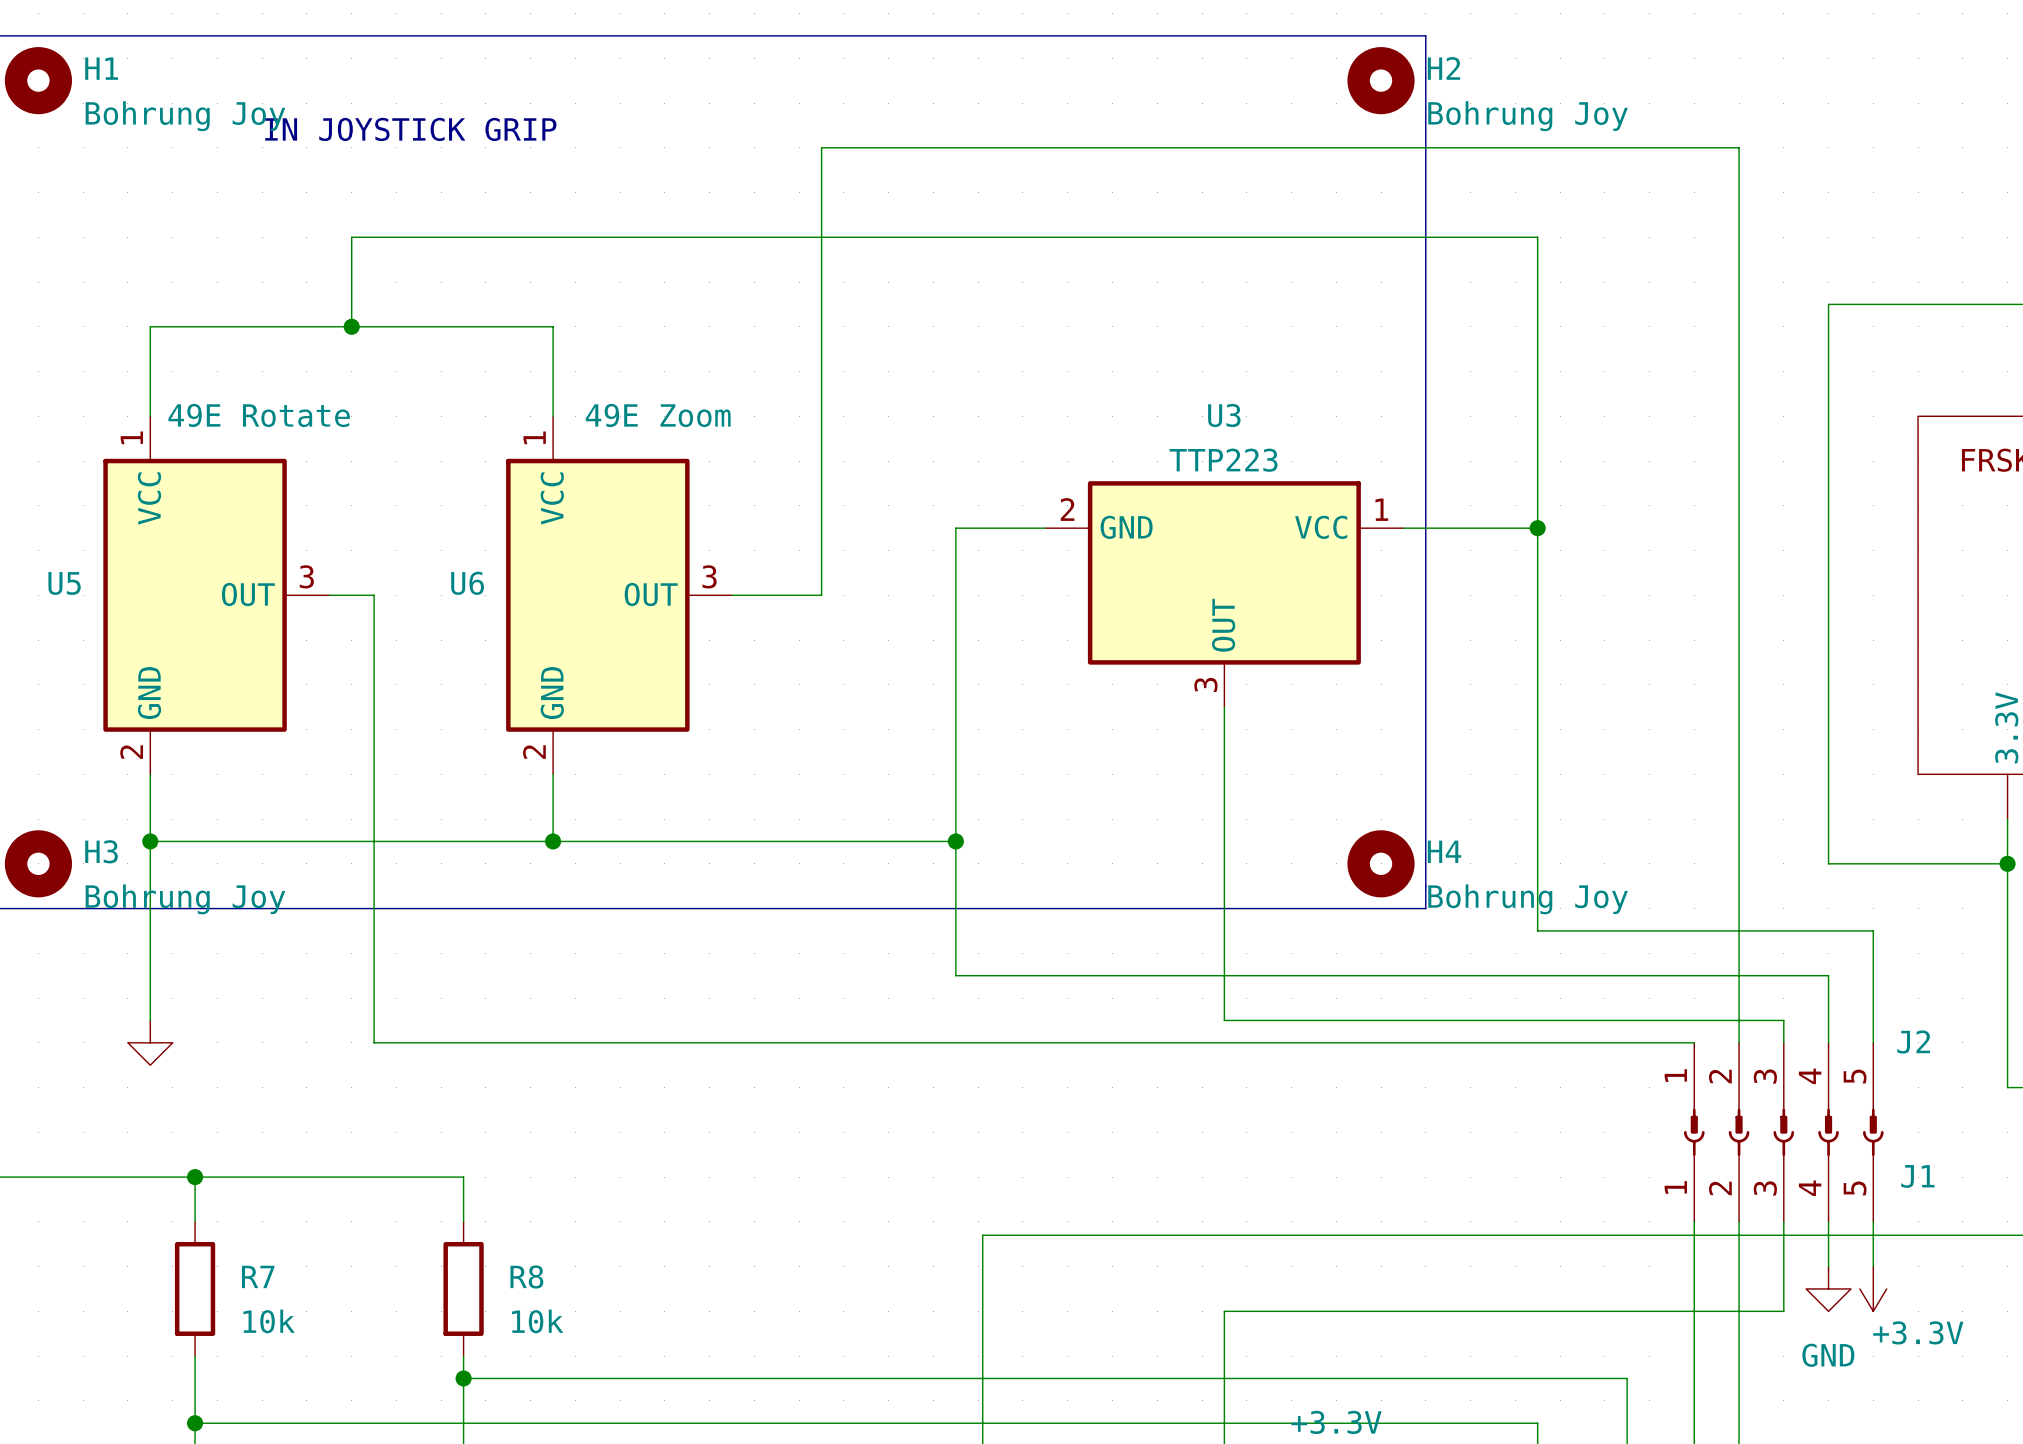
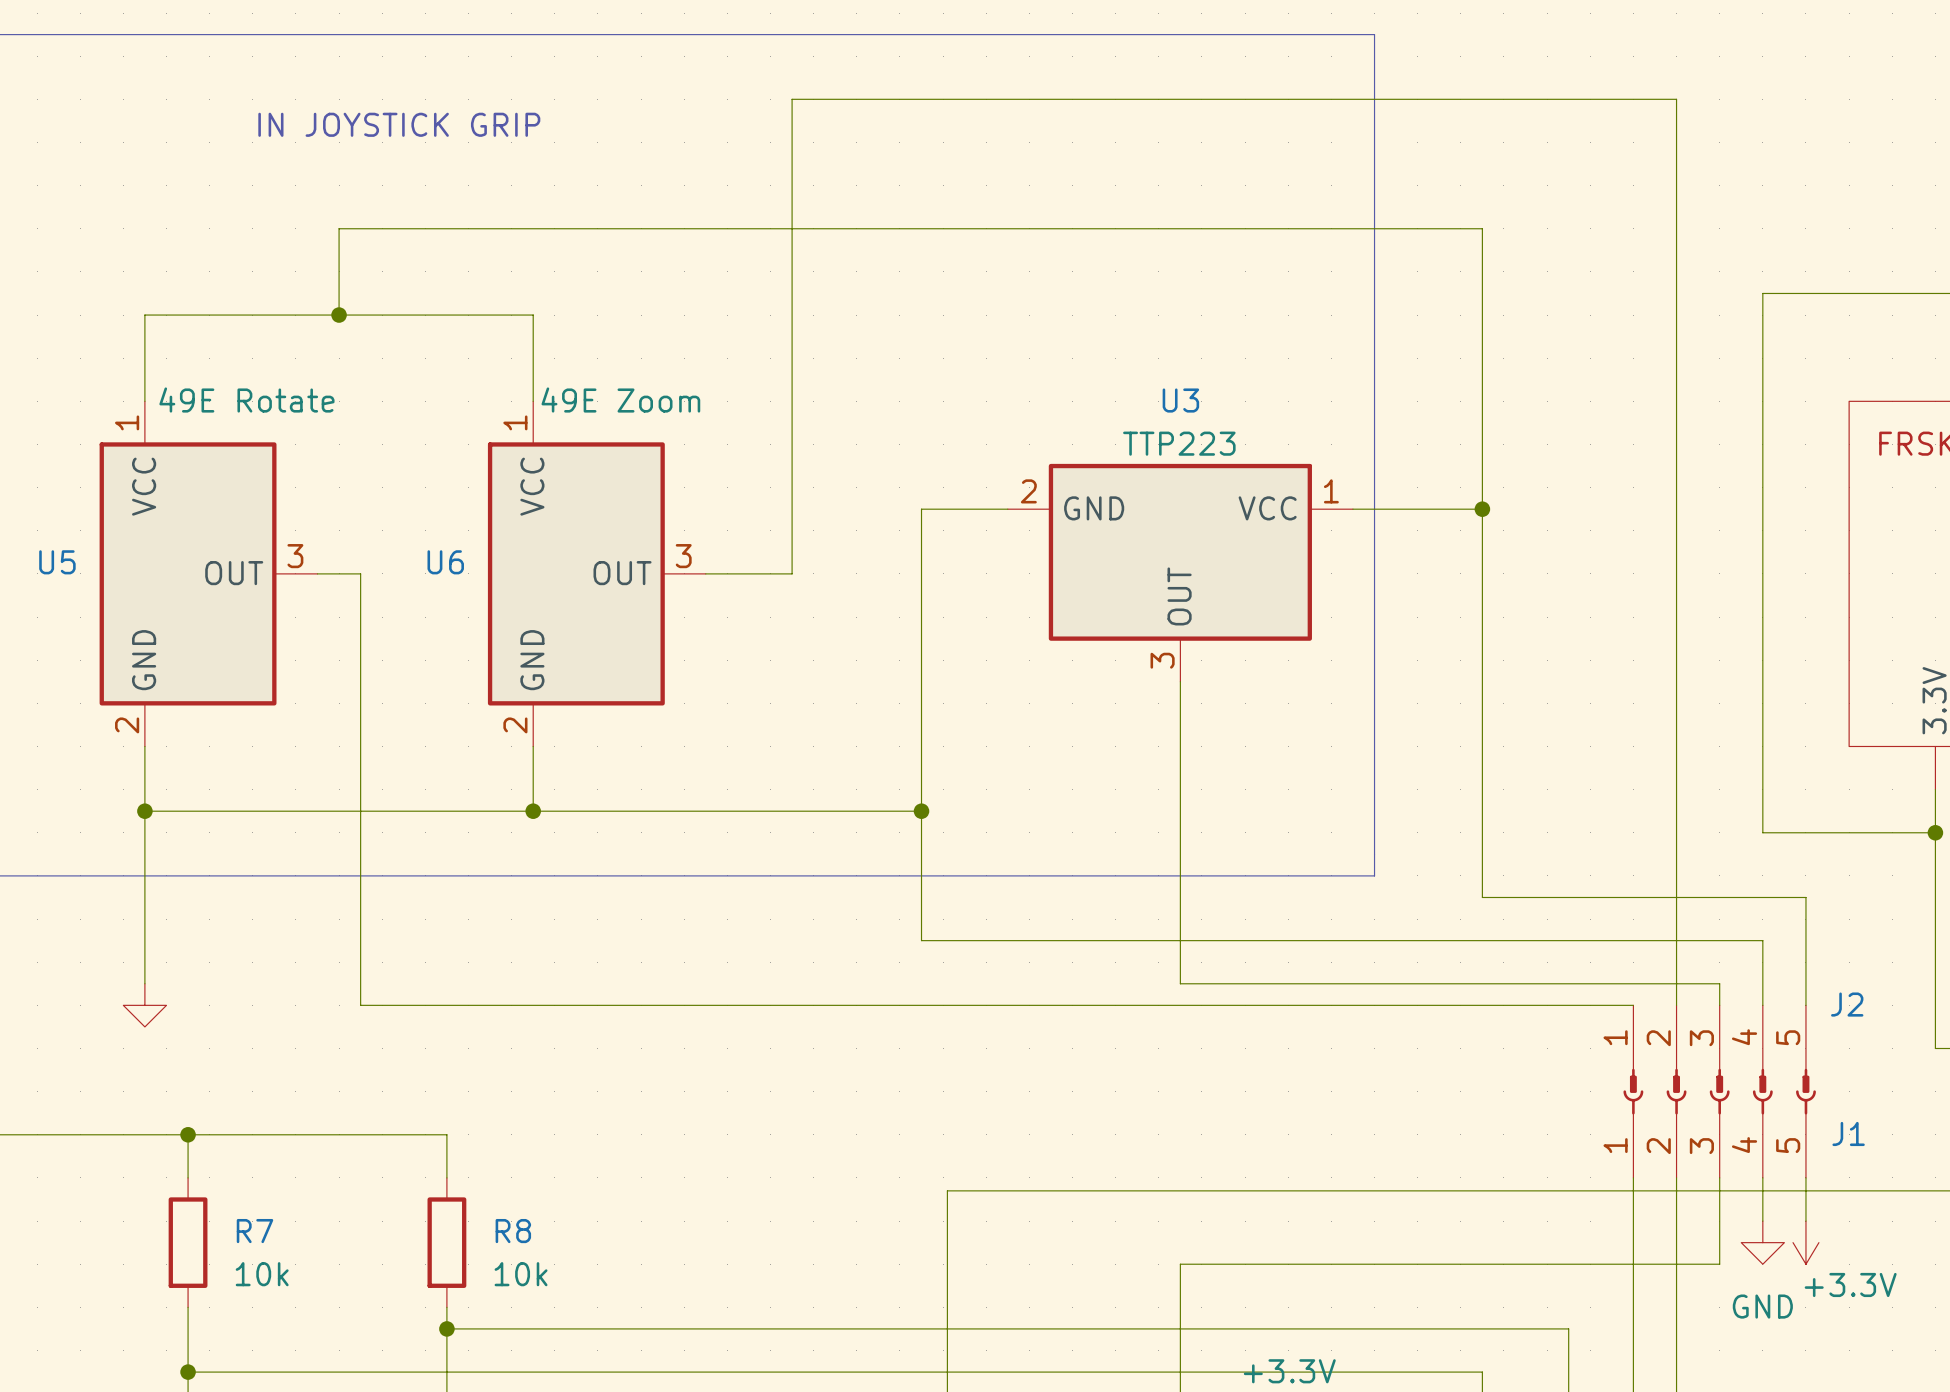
H1: Bohrung Joy (38, 80) -> none
H2: Bohrung Joy (1381, 80) -> none
wire: (821, 147) (1739, 147) -> (792, 142) (792, 99) (1676, 99) (1676, 142)
H3: Bohrung Joy (38, 863) -> none
H4: Bohrung Joy (1381, 863) -> none

